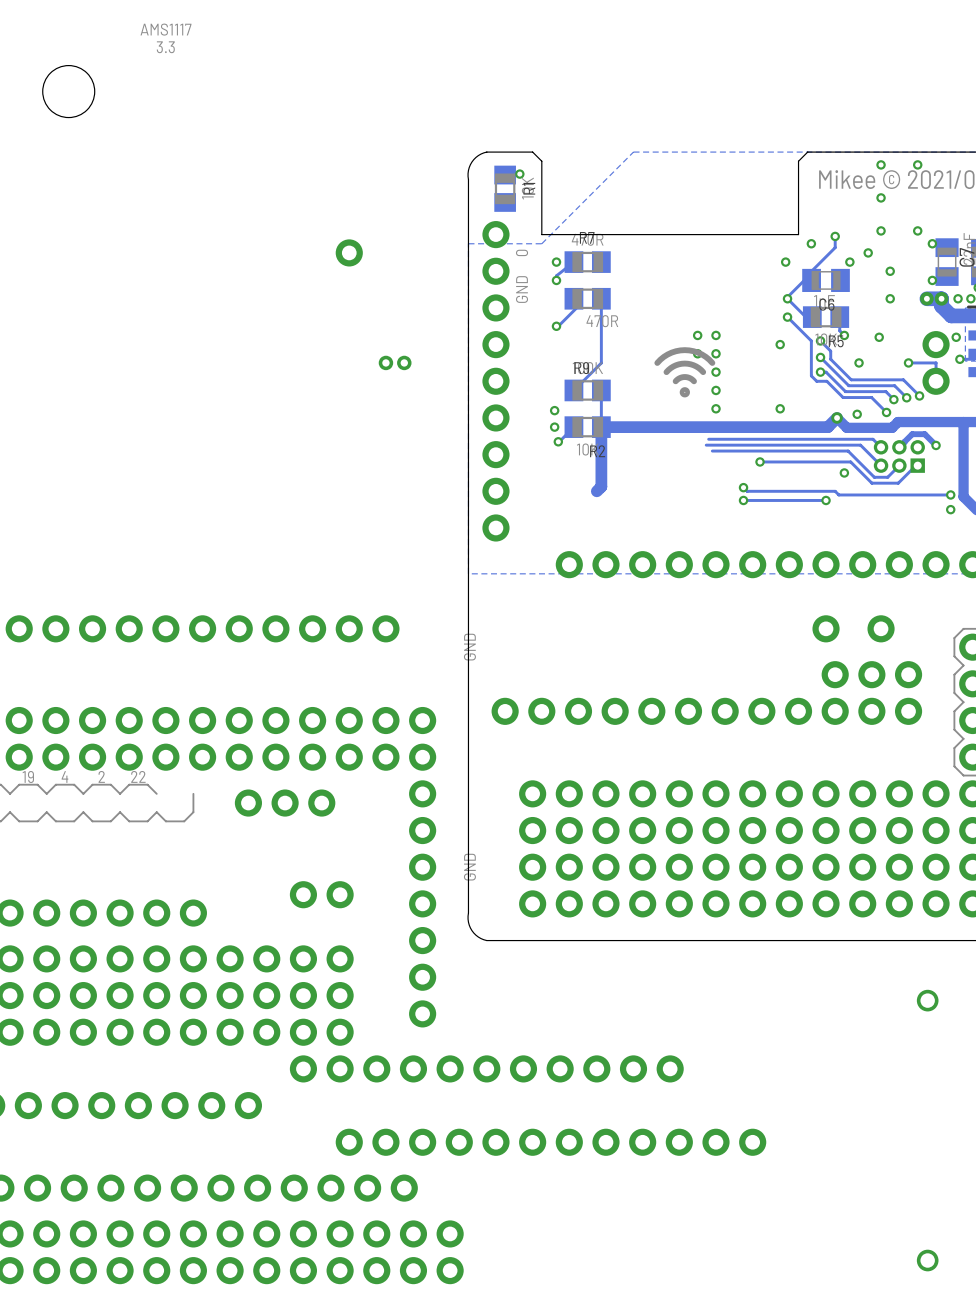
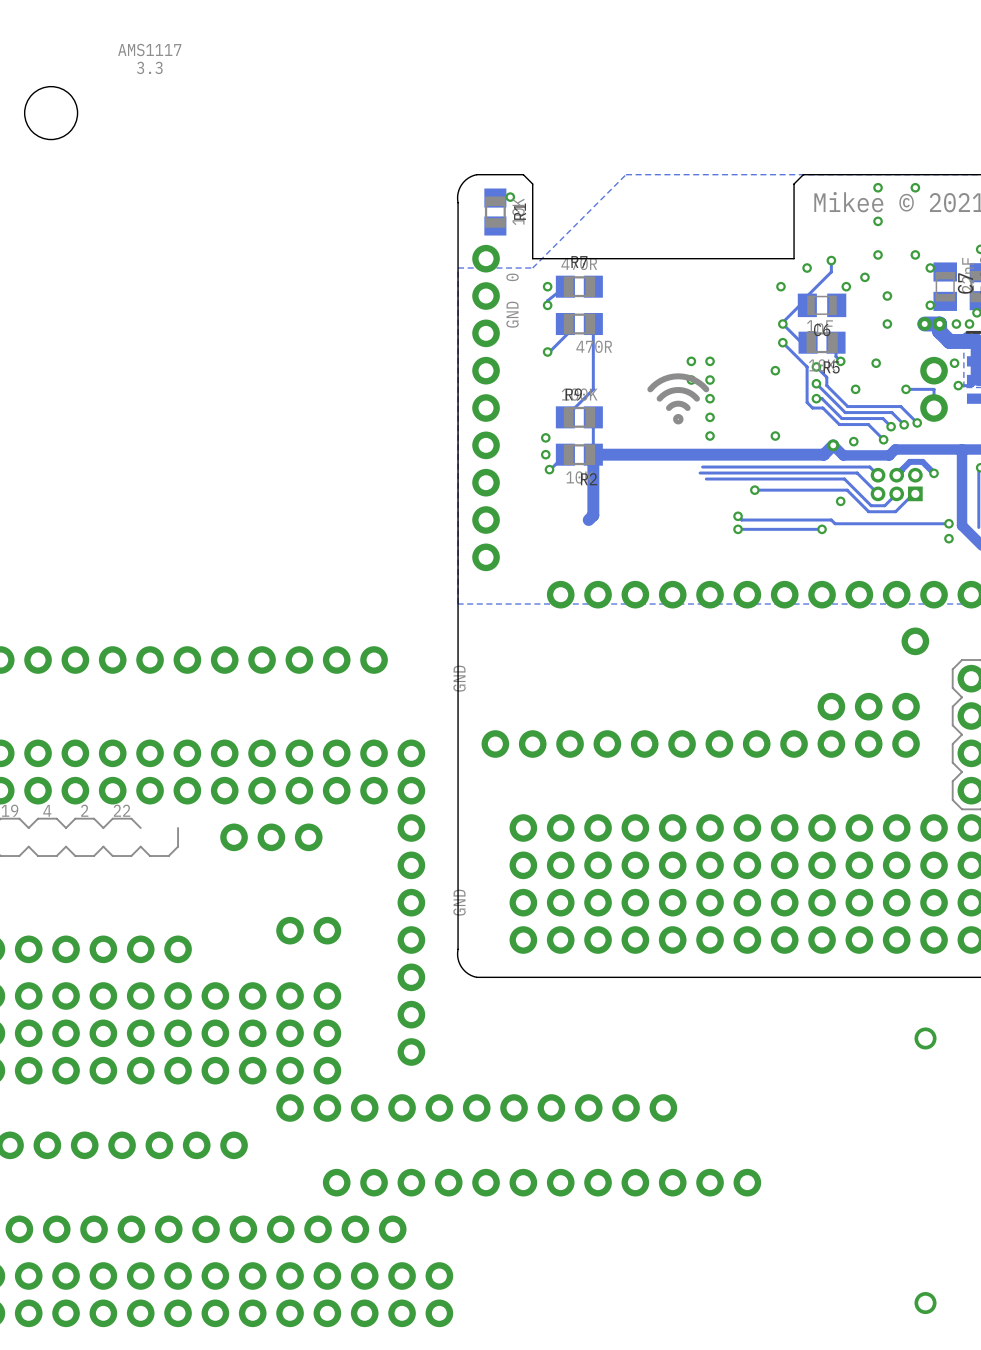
part: (349, 252) -> none
part: (395, 362) -> none
part: (826, 628) -> none
part position: (881, 628) -> (915, 641)

